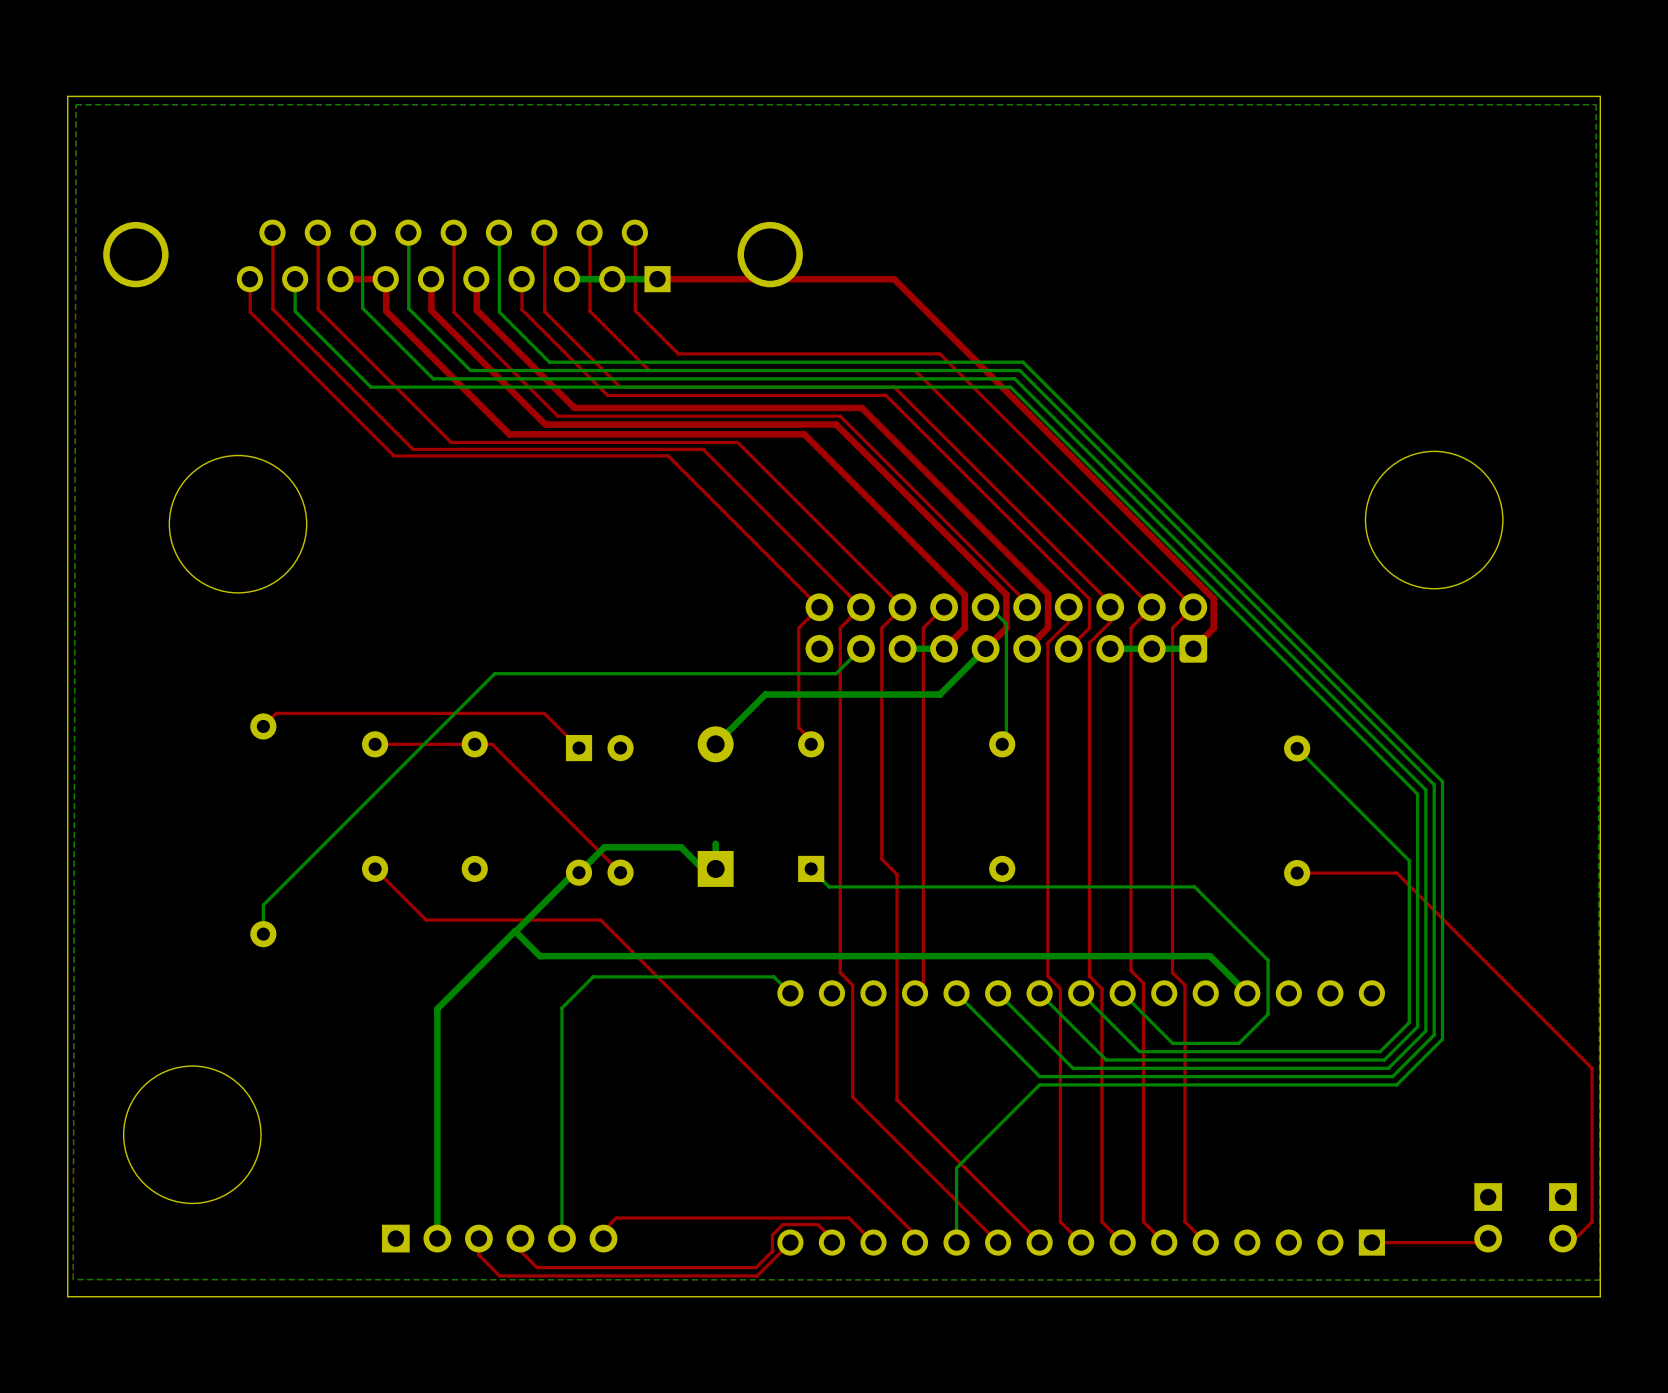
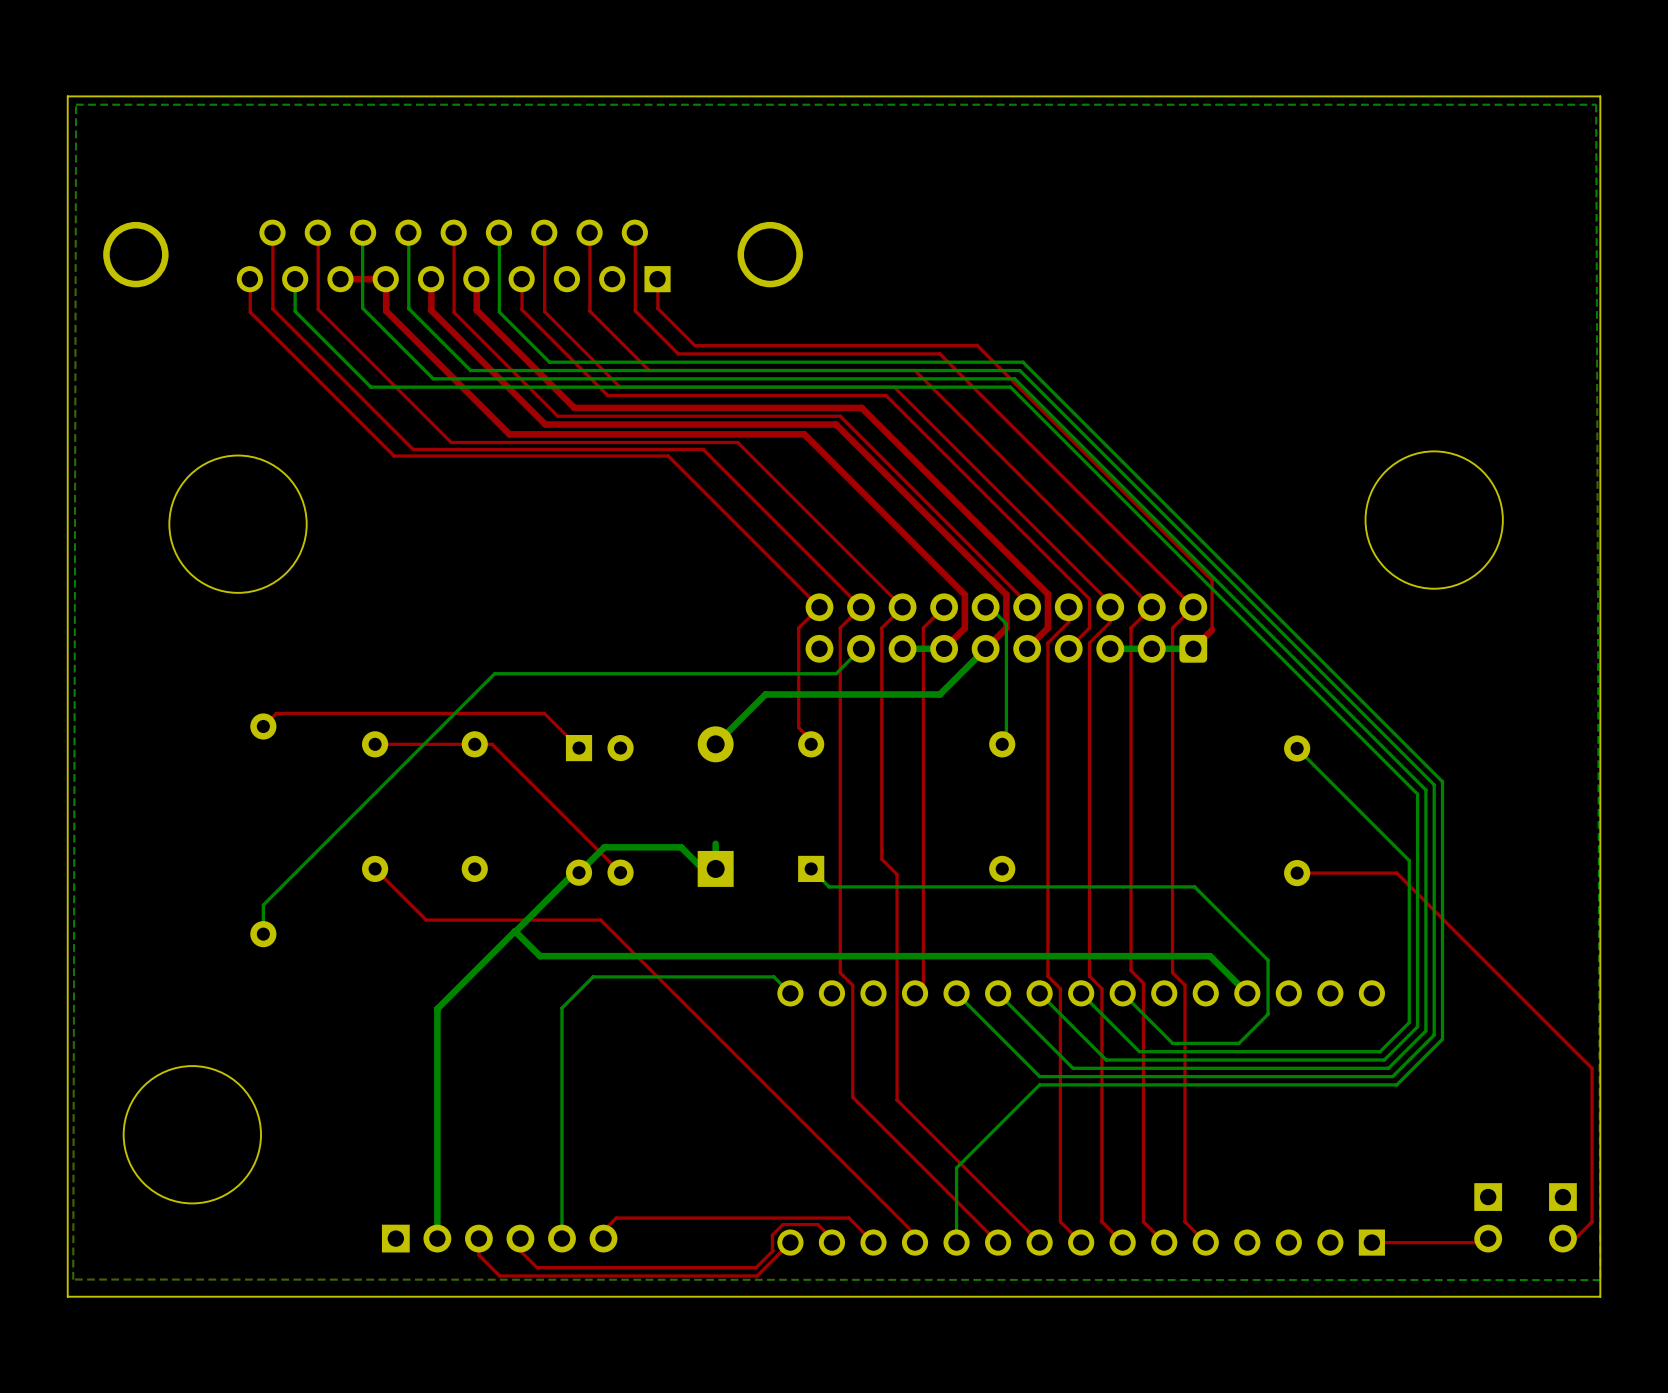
top track: (657, 279) (894, 279) (1213, 598) (1213, 628) (1212, 629) -> (657, 279) (657, 308) (694, 345) (977, 345) (1212, 580) (1212, 629)
bottom track: (657, 279) (566, 279) -> none

